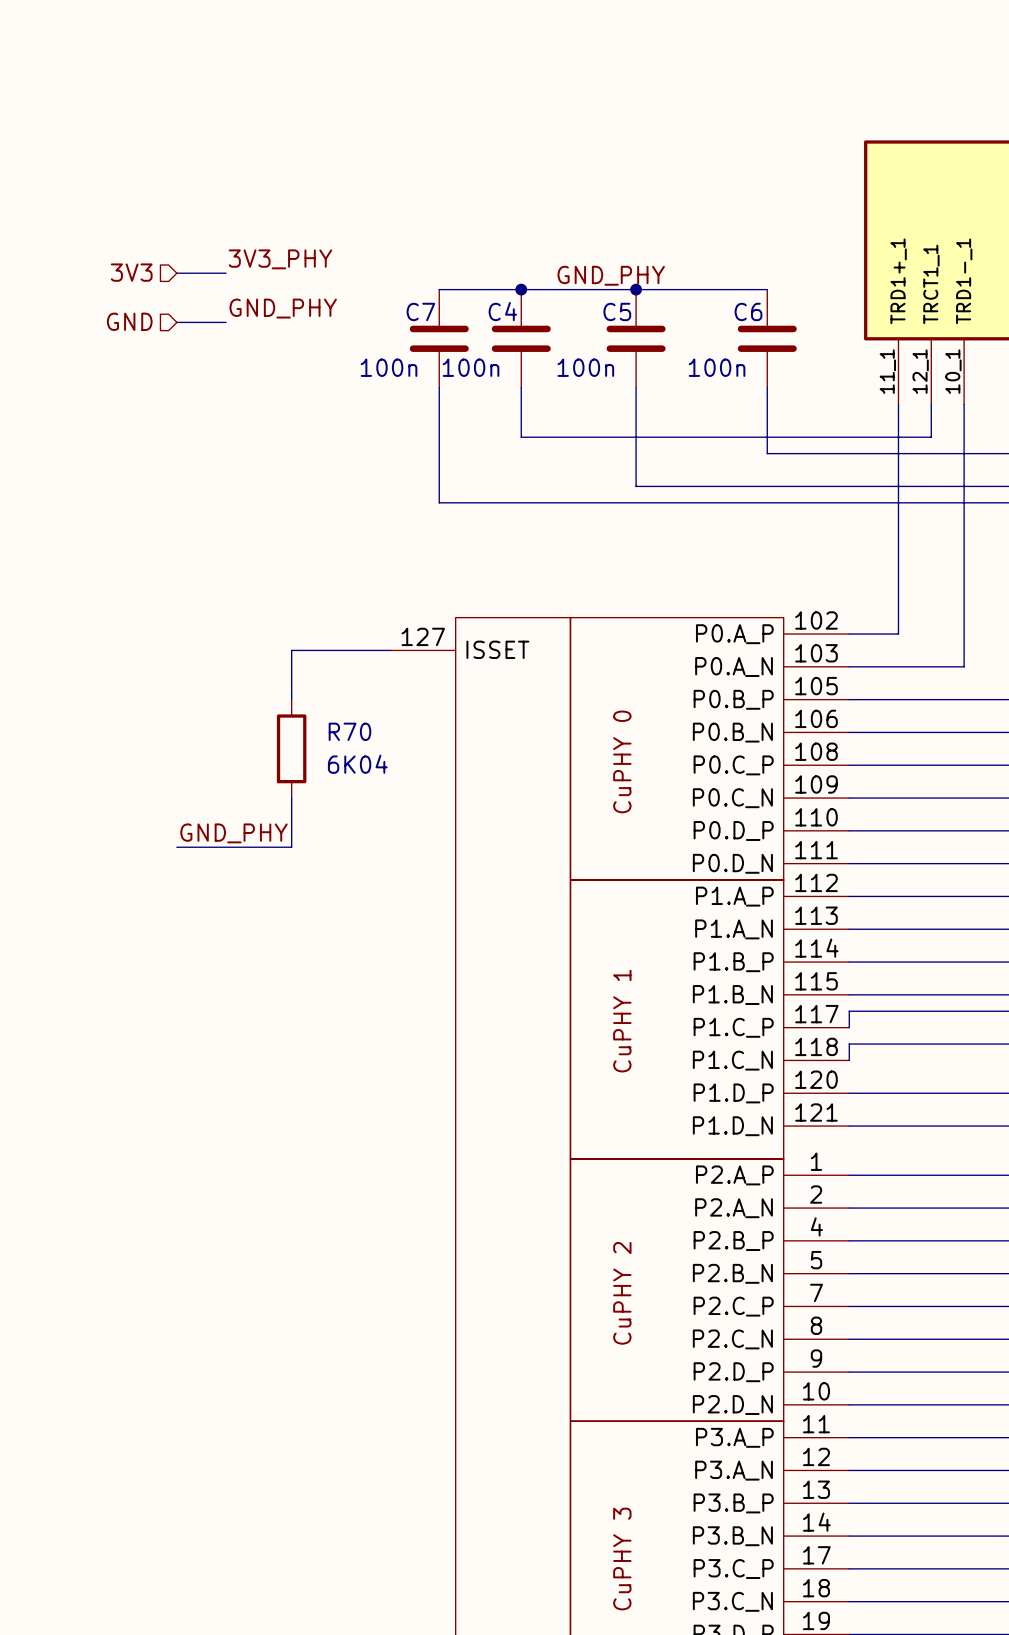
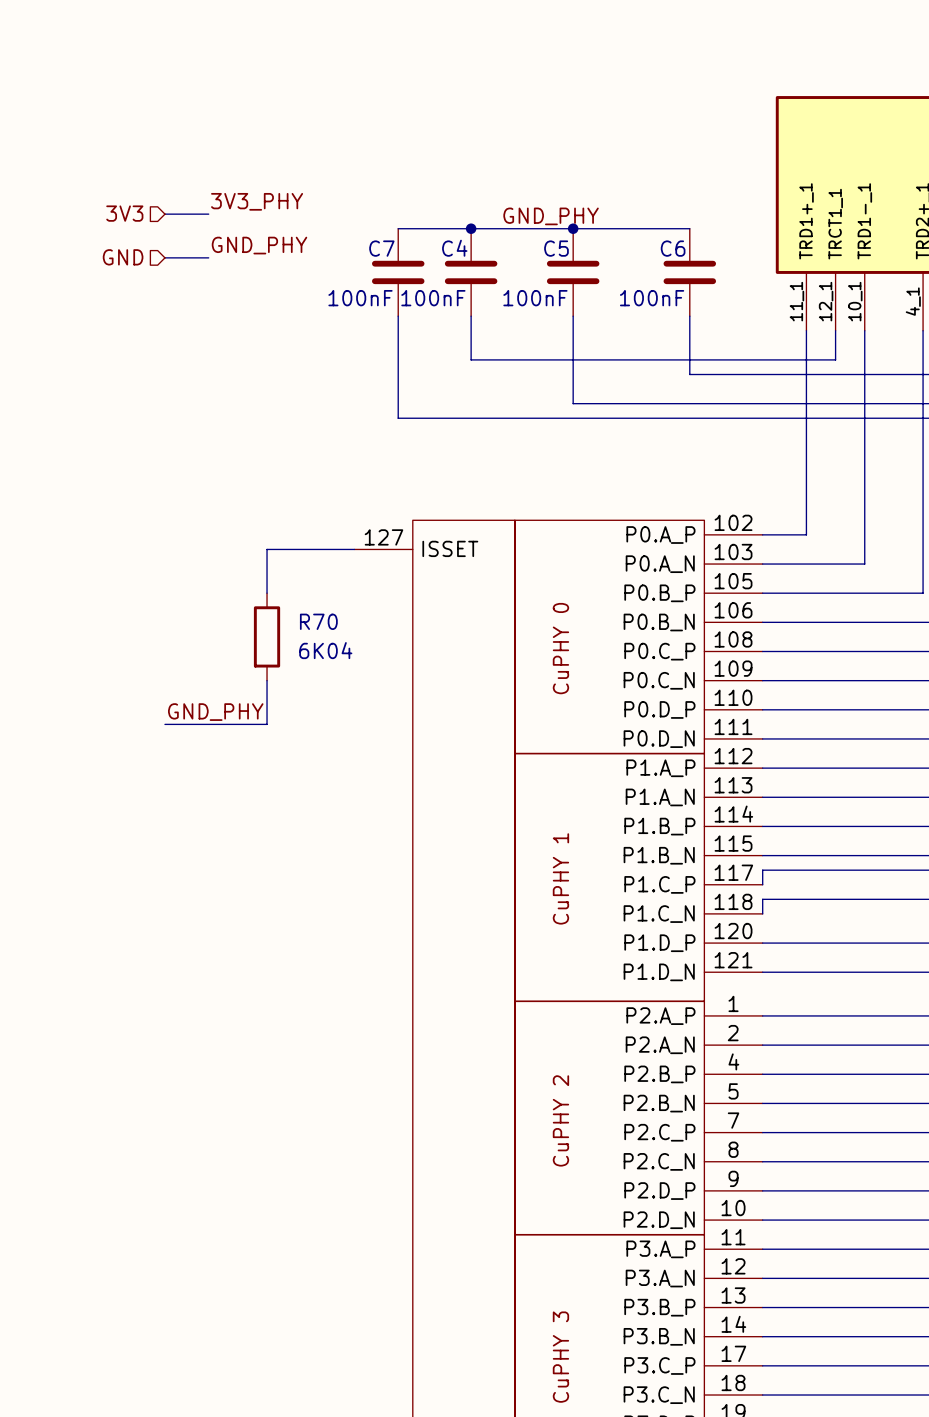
C7 value: 100n (389, 367) -> 100nF (360, 298)
C4 value: 100n (471, 367) -> 100nF (433, 298)
C5 value: 100n (585, 367) -> 100nF (535, 298)
C6 value: 100n (717, 367) -> 100nF (652, 298)

